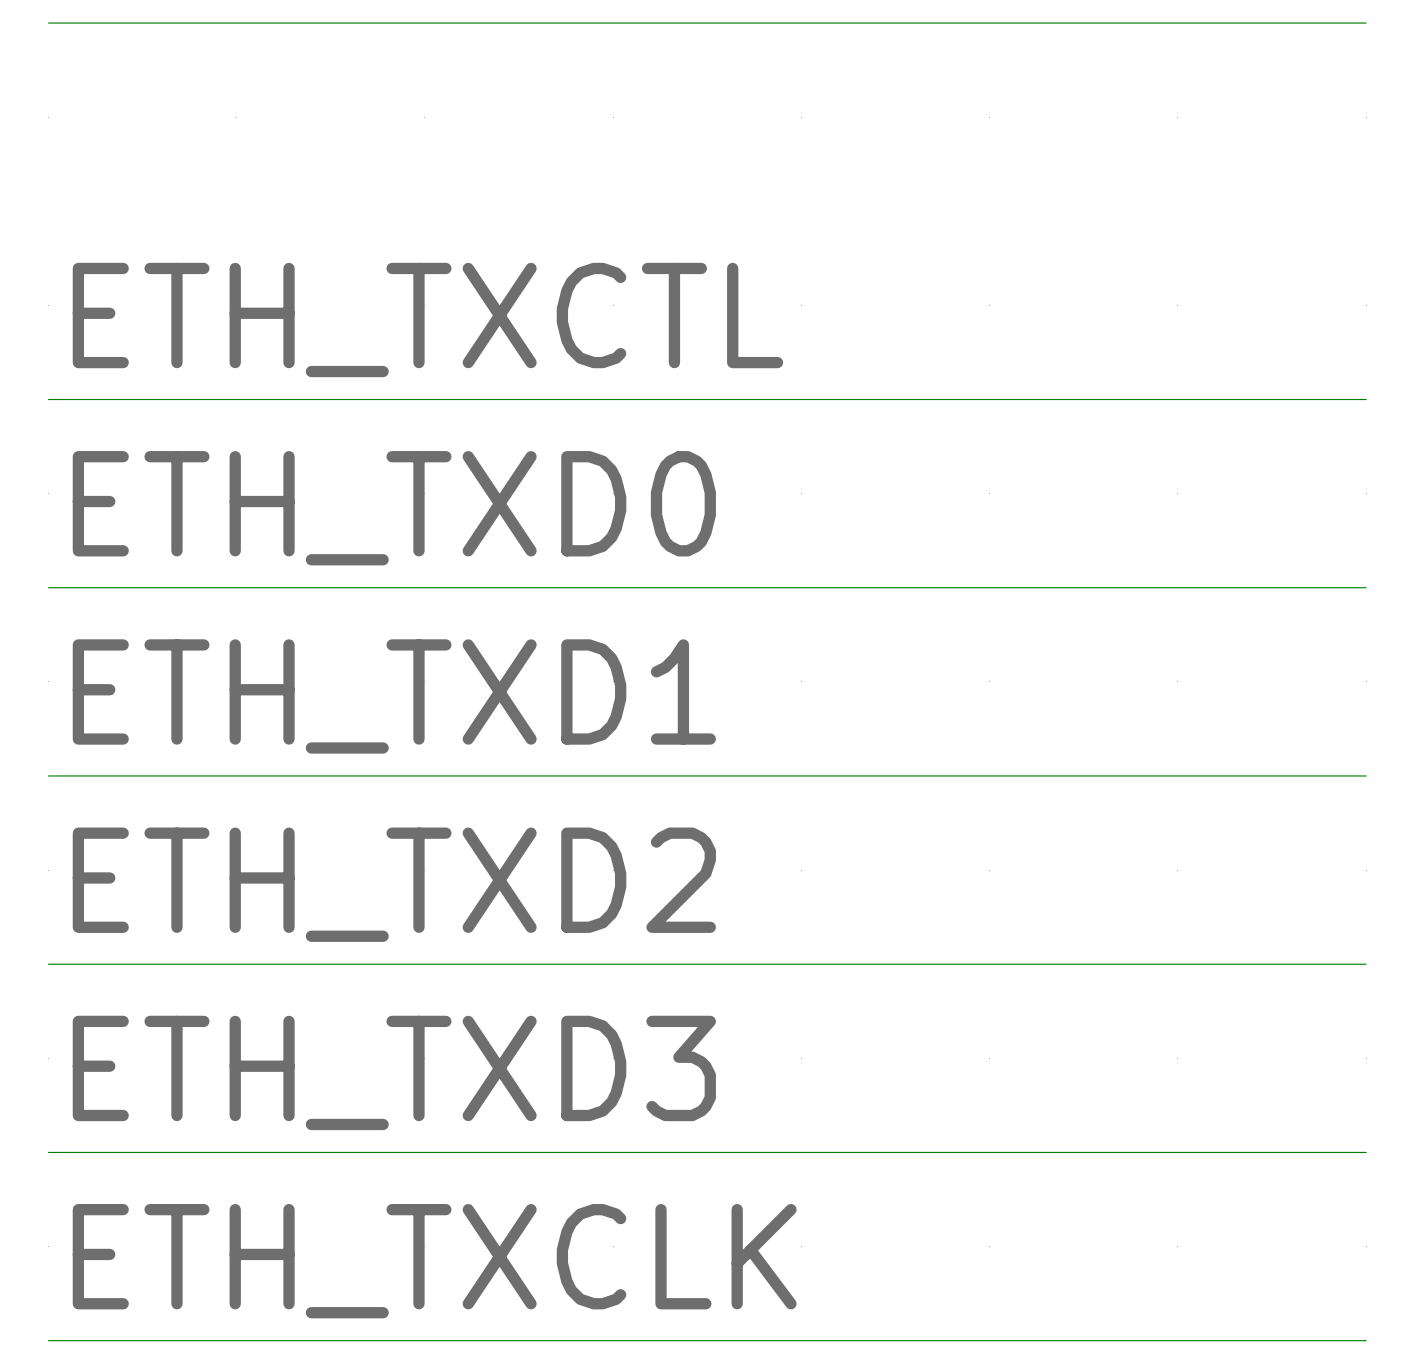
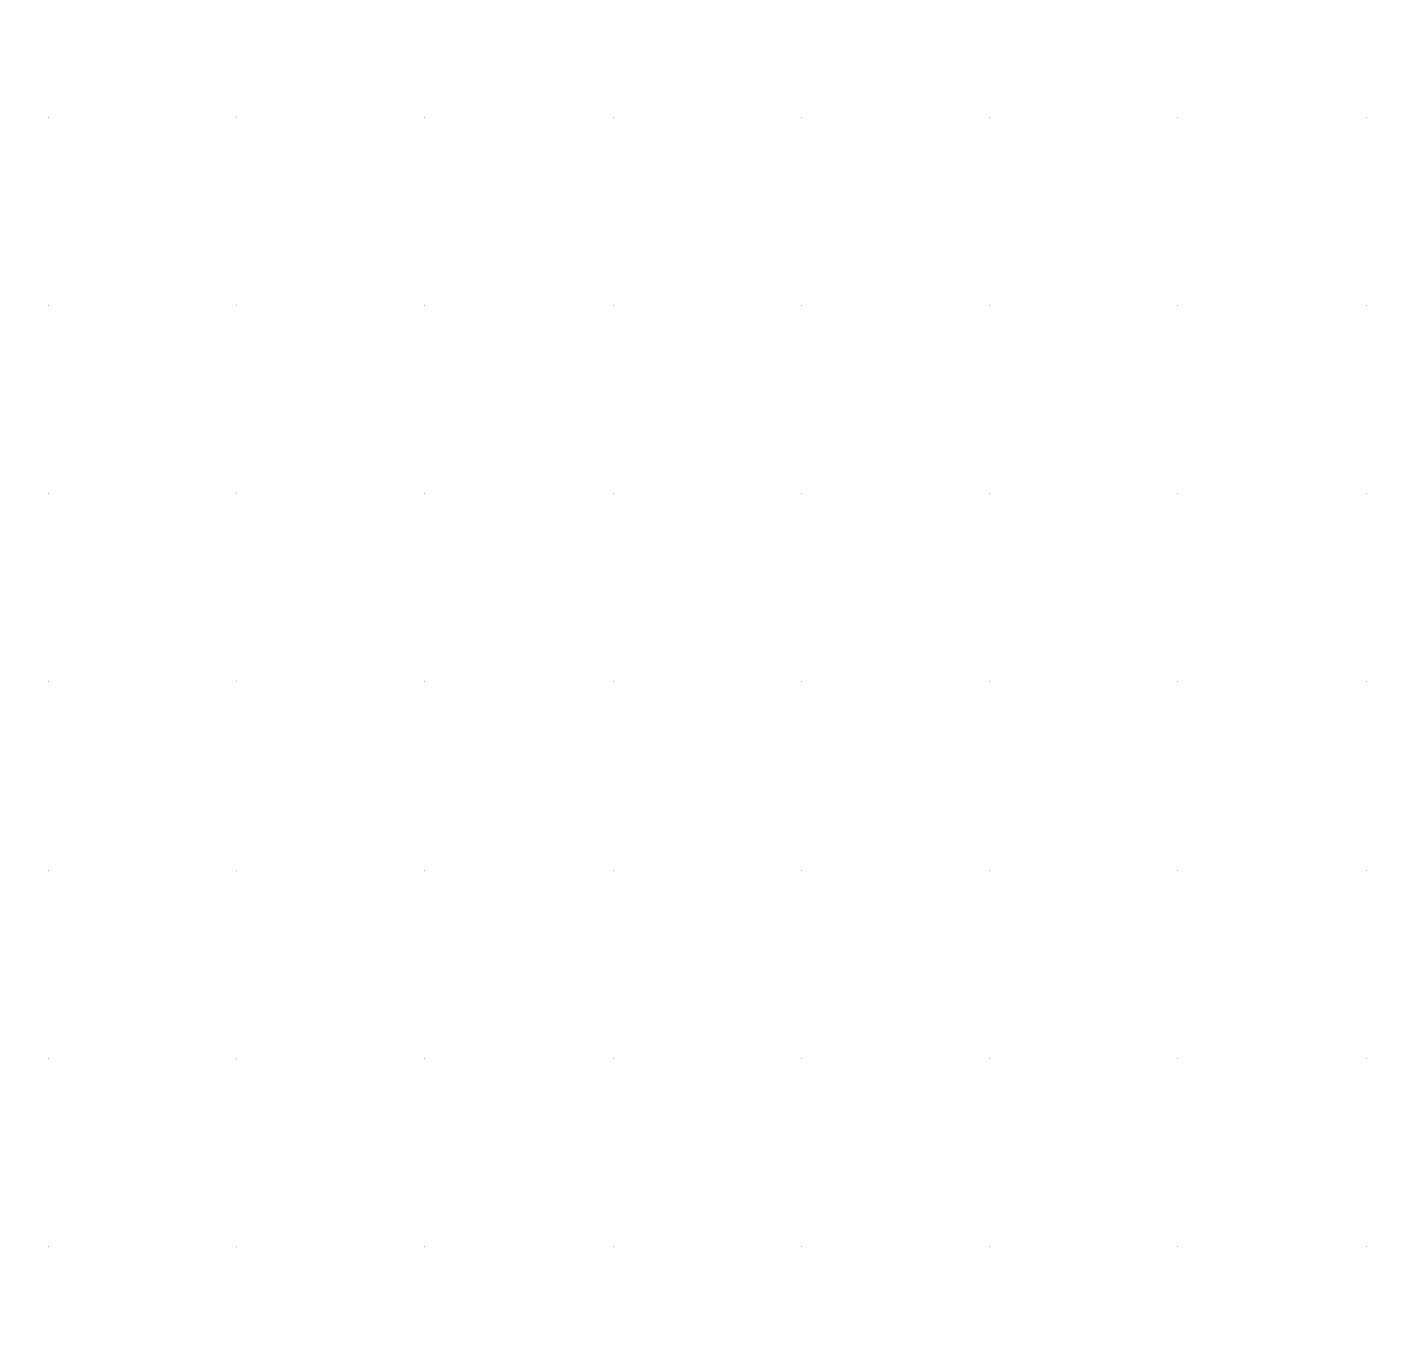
wire: (48, 23) (1366, 23) -> none
label: ETH_TXCTL (427, 320) -> none
wire: (48, 399) (1366, 399) -> none
label: ETH_TXD0 (394, 508) -> none
wire: (48, 587) (1366, 587) -> none
label: ETH_TXD1 (394, 696) -> none
wire: (48, 775) (1366, 775) -> none
label: ETH_TXD2 (394, 884) -> none
wire: (48, 964) (1366, 964) -> none
label: ETH_TXD3 (394, 1072) -> none
wire: (48, 1152) (1366, 1152) -> none
label: ETH_TXCLK (434, 1261) -> none
wire: (48, 1340) (1366, 1340) -> none

